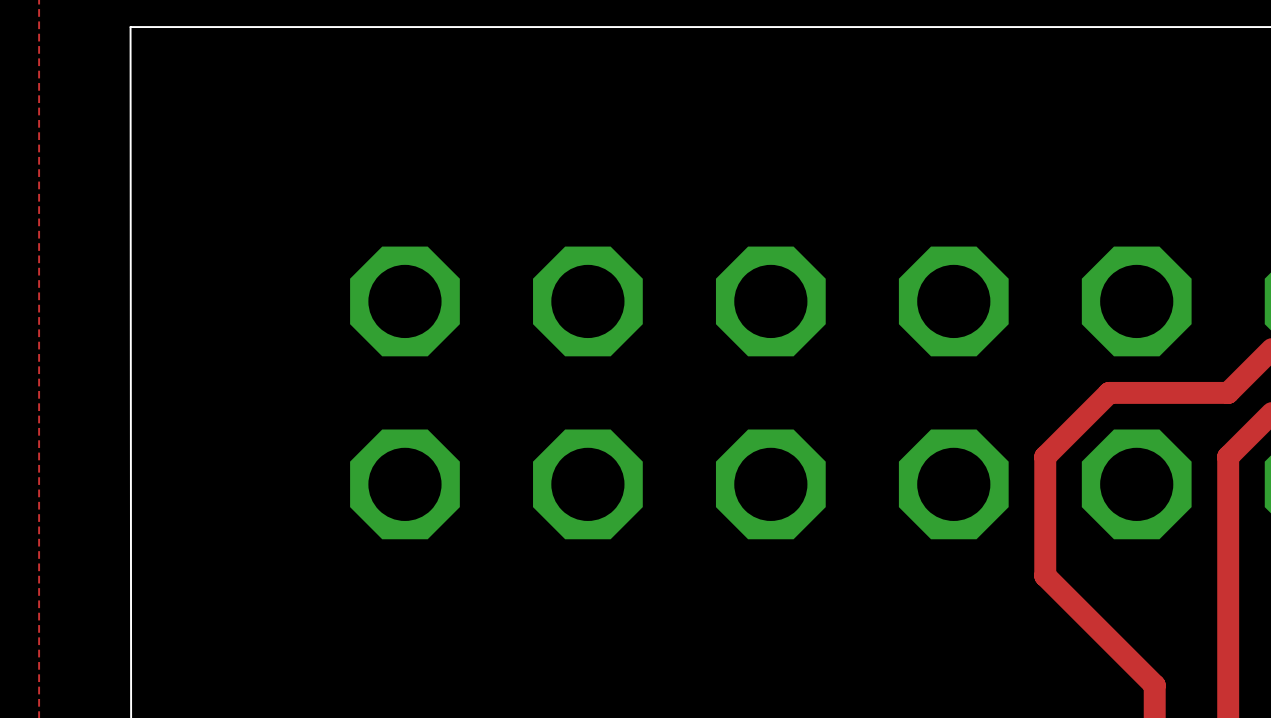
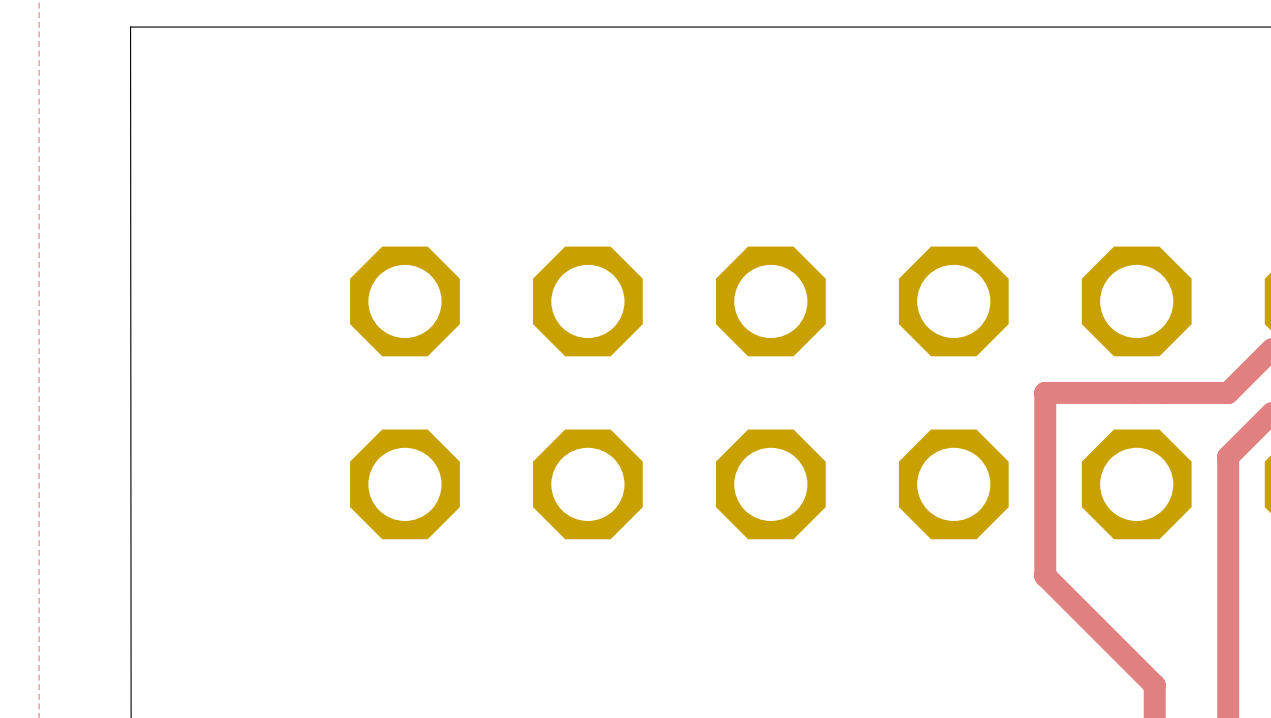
top track: (1109, 392) (1045, 456) -> (1109, 392) (1045, 392) (1045, 456)

